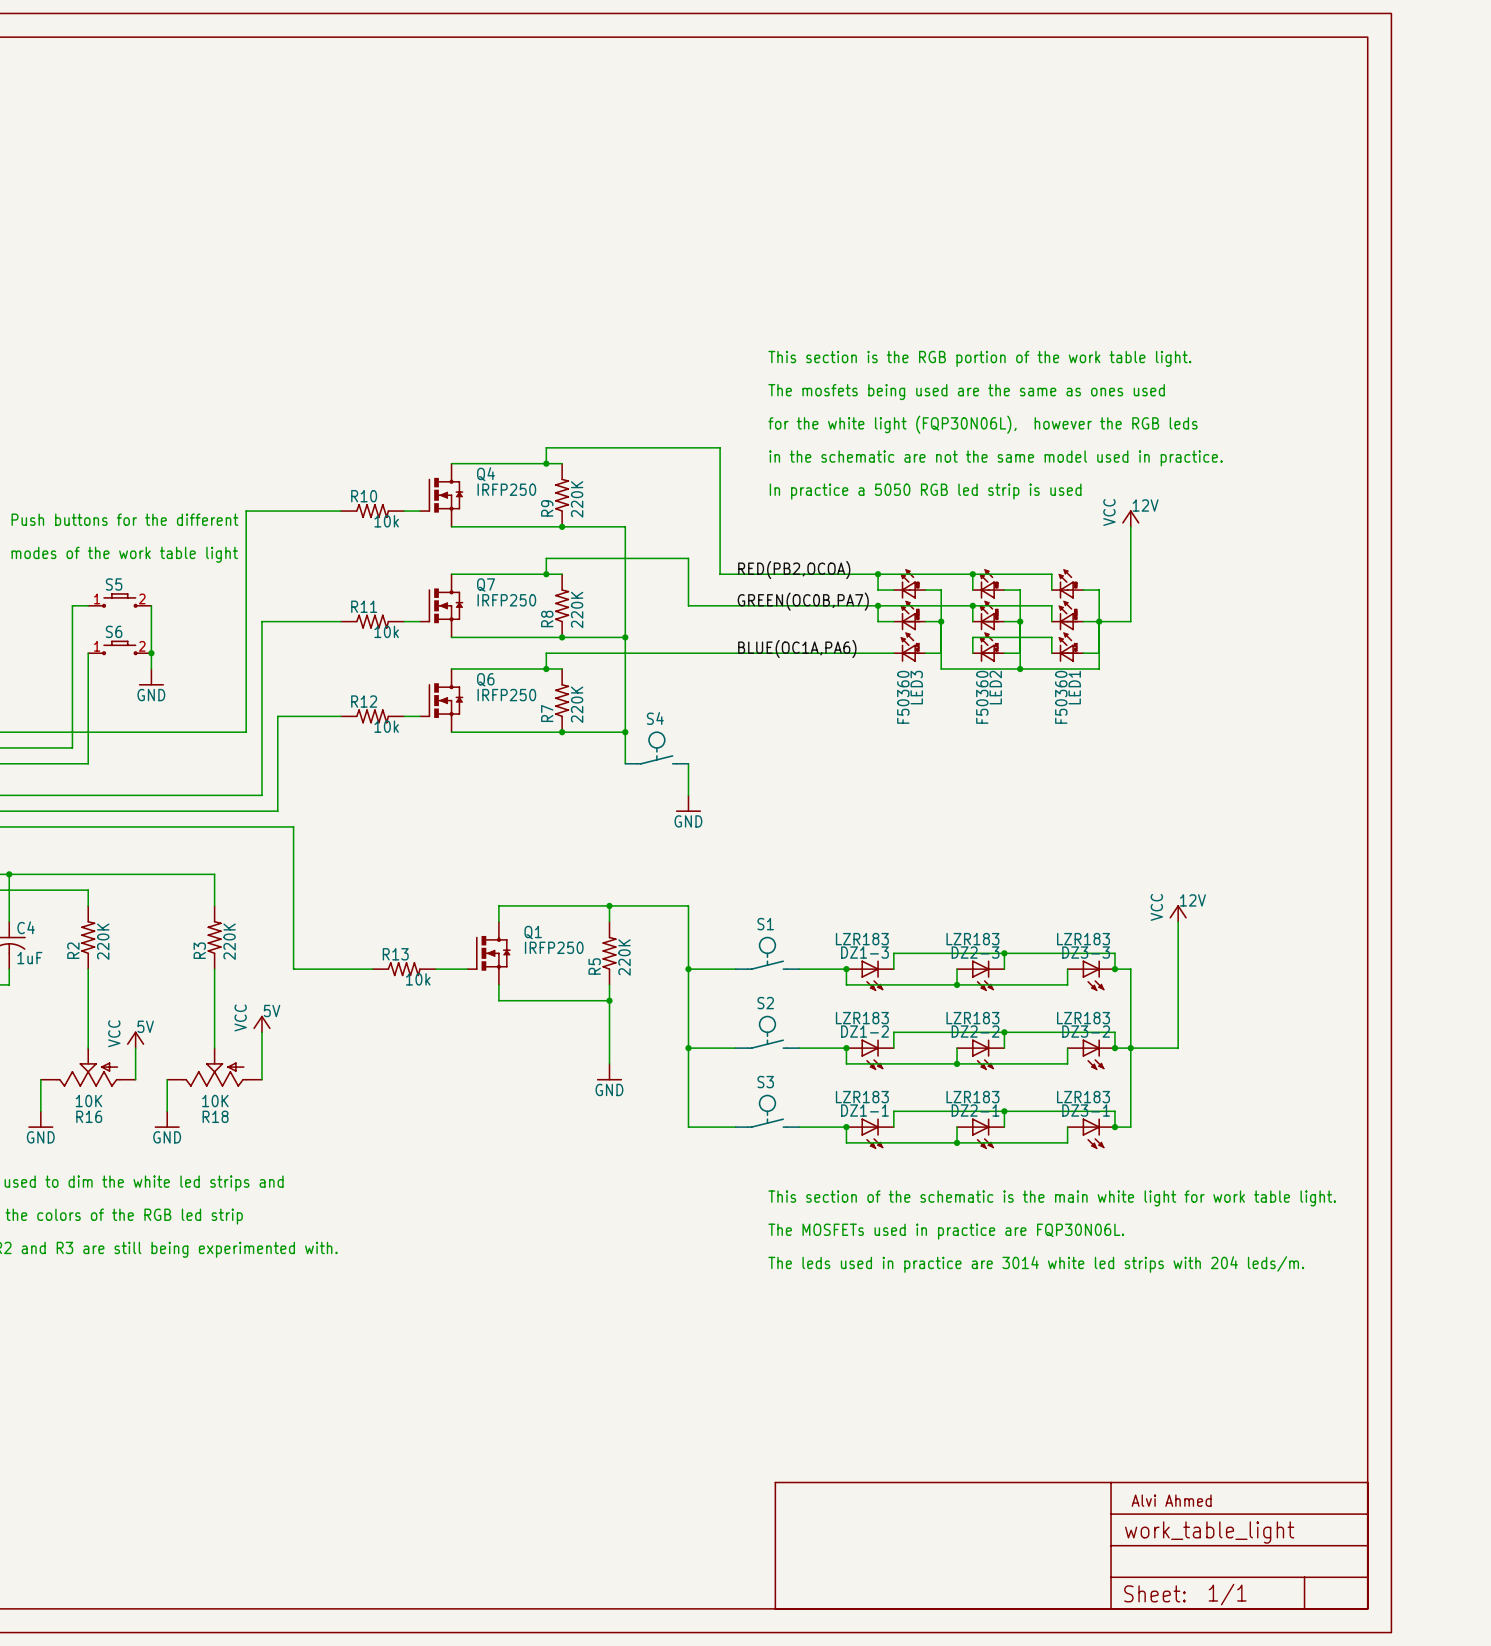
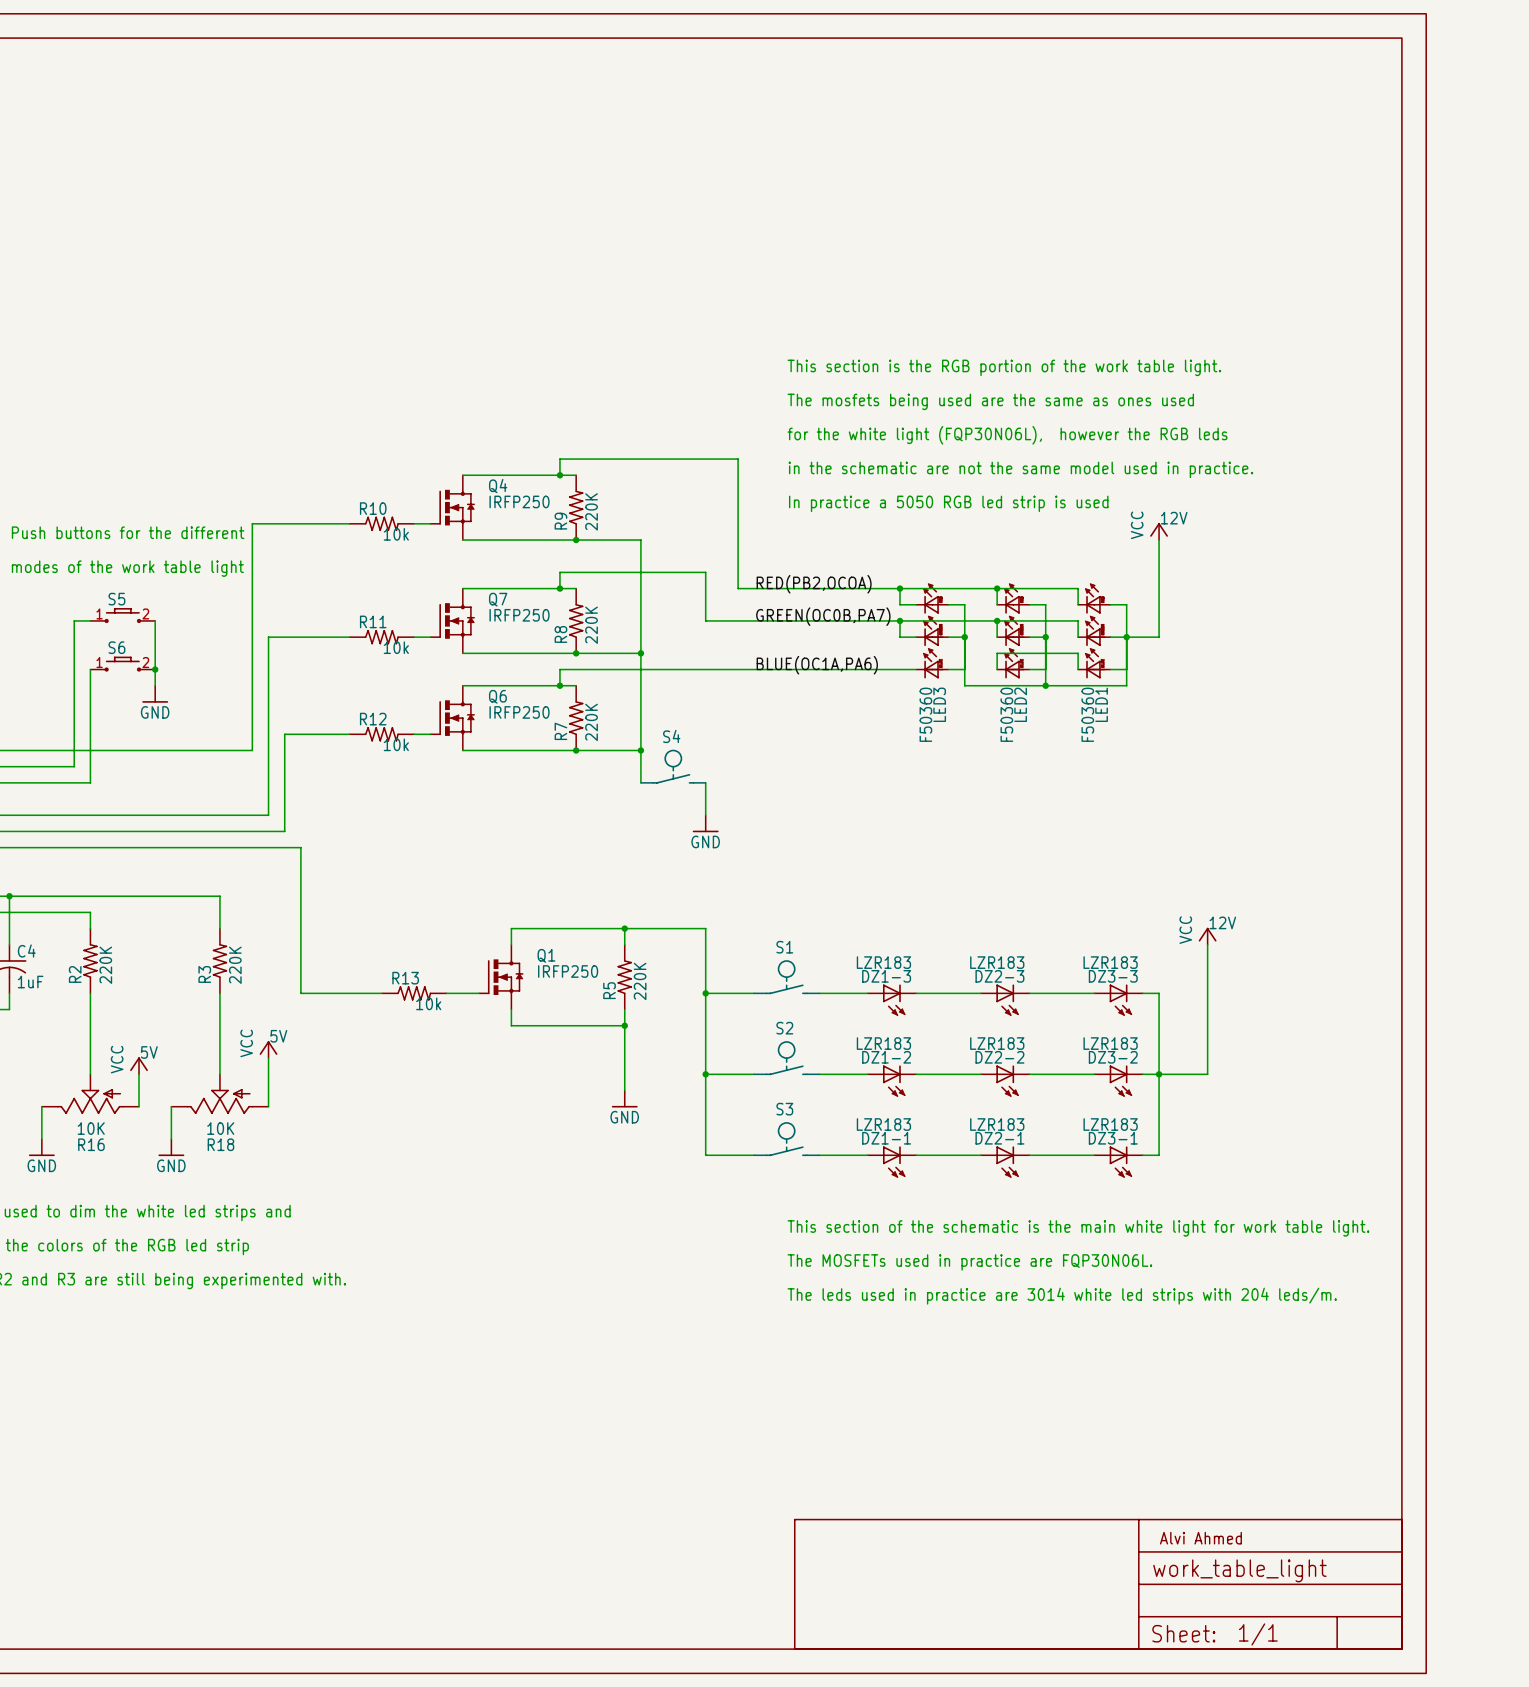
wire: (1004, 953) (1004, 969) -> (1094, 993) (1029, 993)
junction: (1004, 953) -> none
wire: (846, 969) (846, 984) (1067, 984) (1067, 969) -> none
junction: (846, 969) -> none
wire: (893, 969) (893, 953) (1114, 953) (1114, 969) -> none
wire: (957, 969) (957, 984) -> (980, 993) (916, 993)
junction: (1114, 969) -> none
junction: (957, 984) -> none
wire: (1004, 1032) (1004, 1048) -> (1094, 1074) (1029, 1074)
junction: (1004, 1032) -> none
wire: (846, 1048) (846, 1063) (1067, 1063) (1067, 1048) -> none
junction: (846, 1048) -> none
wire: (893, 1048) (893, 1032) (1114, 1032) (1114, 1048) -> none
wire: (957, 1048) (957, 1063) -> (980, 1074) (916, 1074)
junction: (1114, 1048) -> none
junction: (957, 1063) -> none
wire: (1004, 1111) (1004, 1127) -> (1094, 1155) (1029, 1155)
junction: (1004, 1111) -> none
wire: (846, 1127) (846, 1142) (1067, 1142) (1067, 1127) -> none
junction: (846, 1127) -> none
wire: (893, 1127) (893, 1111) (1114, 1111) (1114, 1127) -> none
wire: (957, 1127) (957, 1142) -> (980, 1155) (916, 1155)
junction: (1114, 1127) -> none
junction: (957, 1142) -> none

